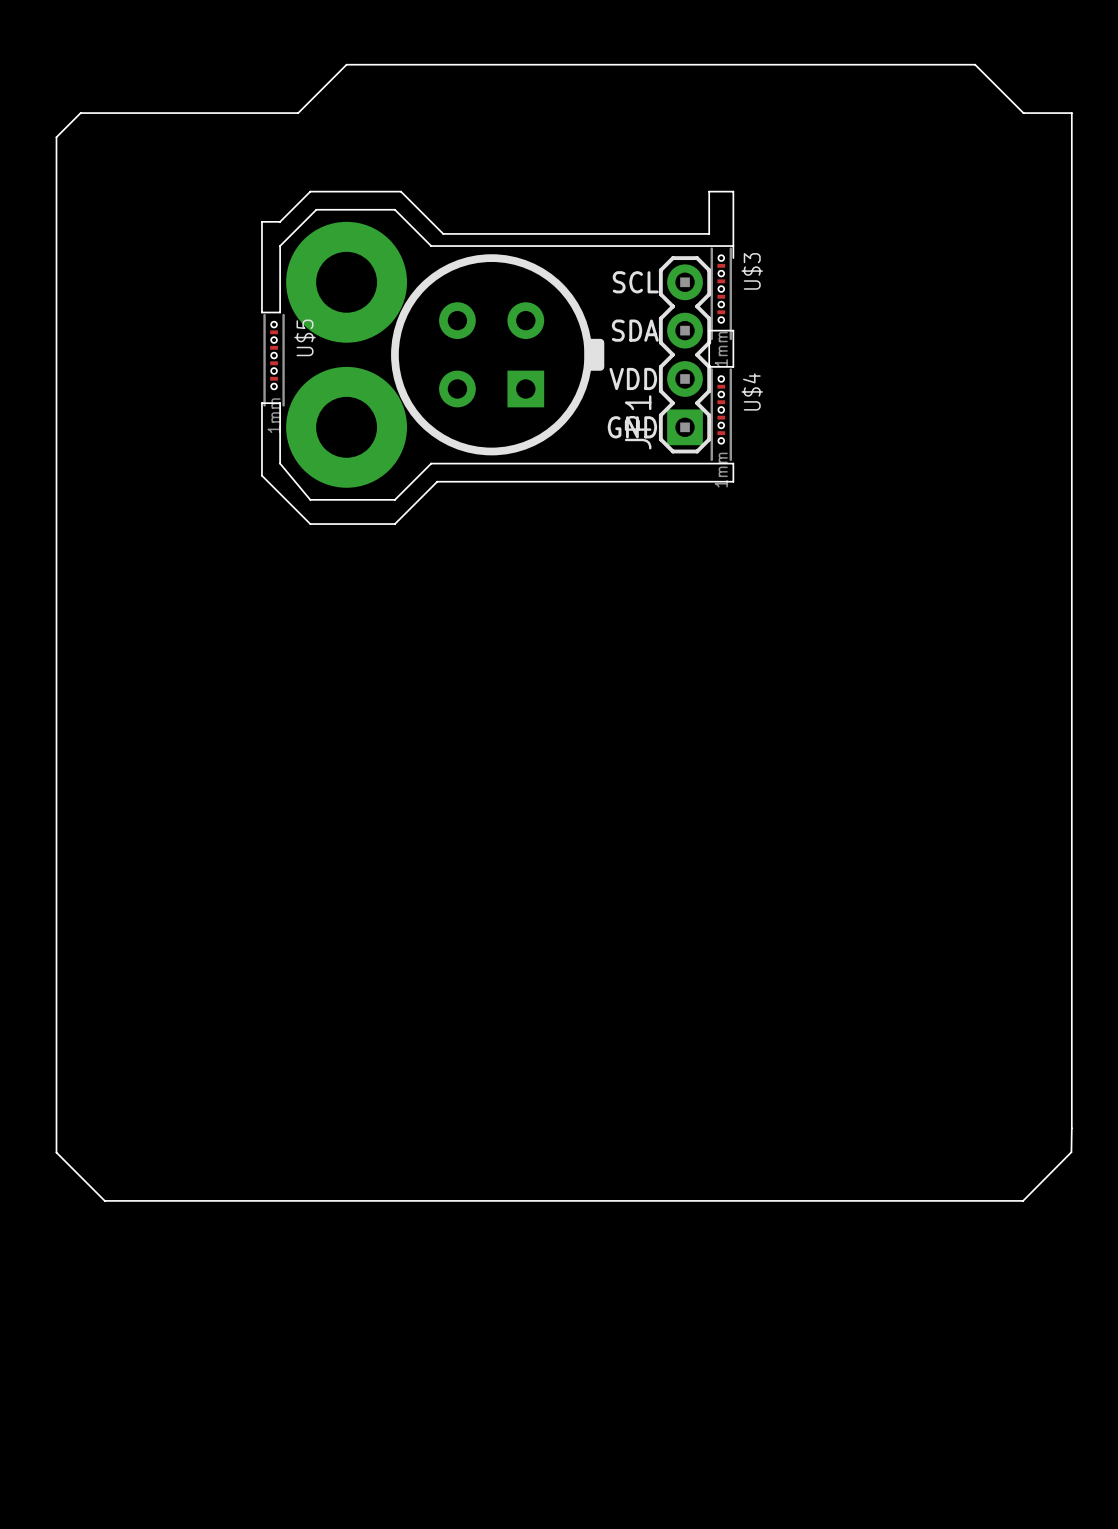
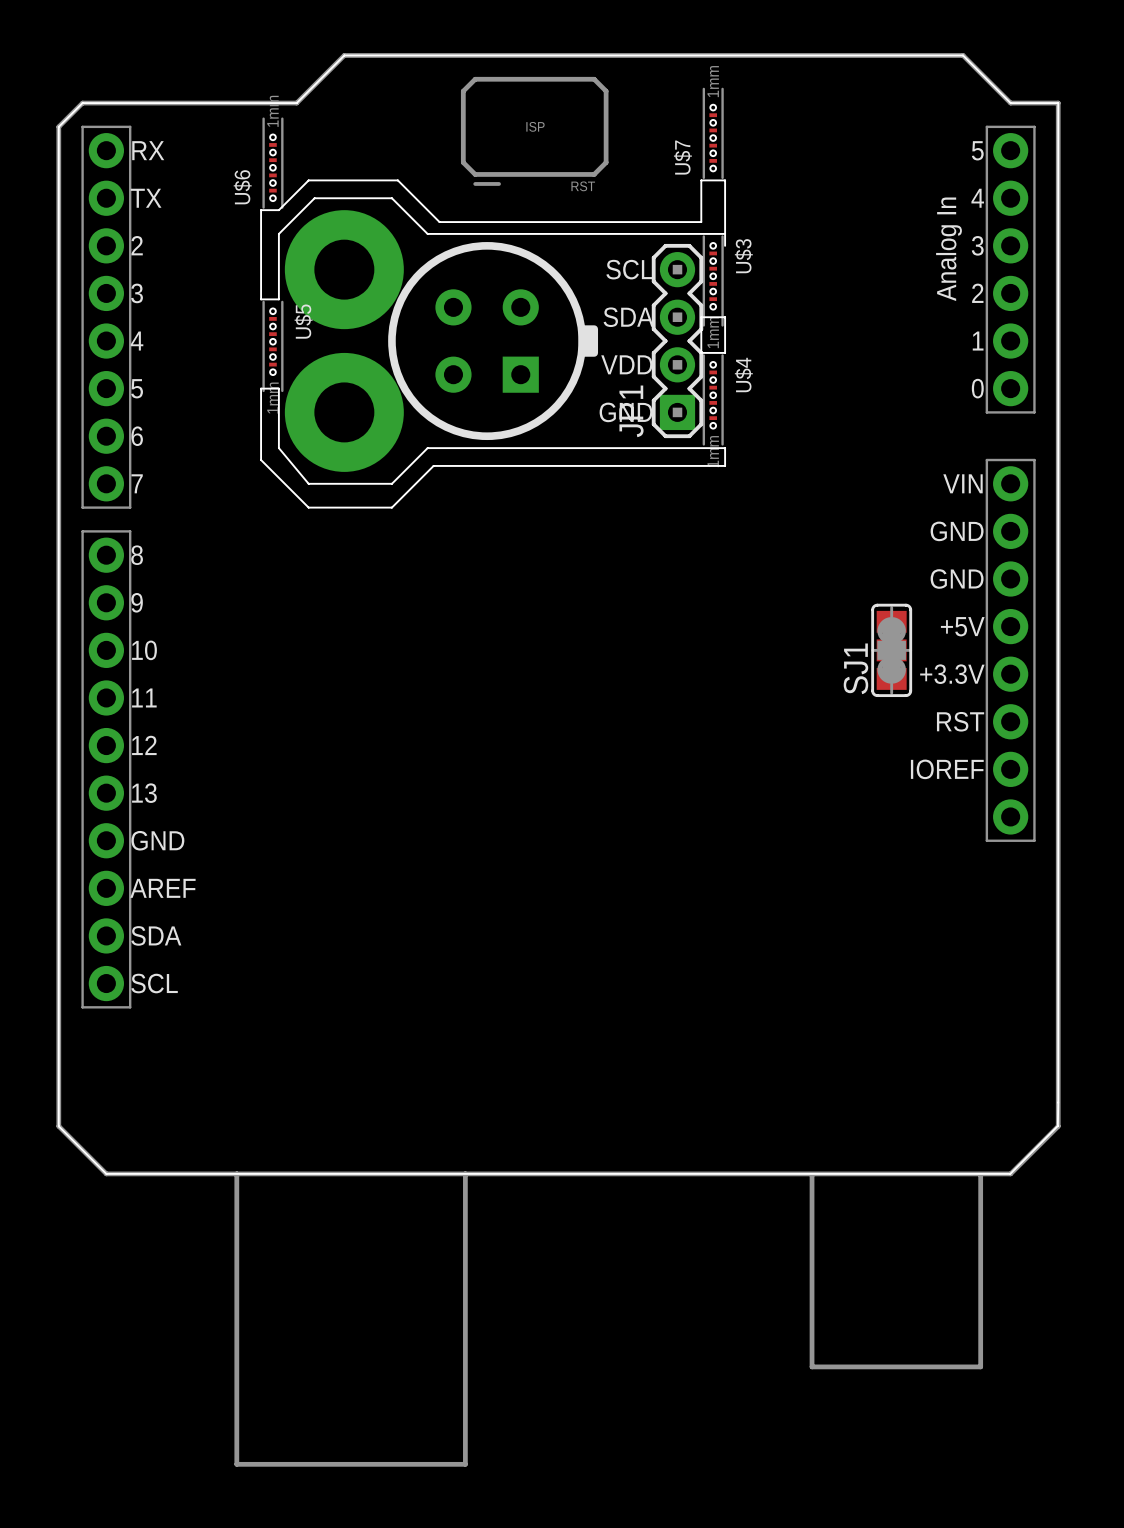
U$7: none -> (713, 133)
U$6: none -> (272, 163)
SJ1: none -> (891, 650)
part: none -> (558, 759)

